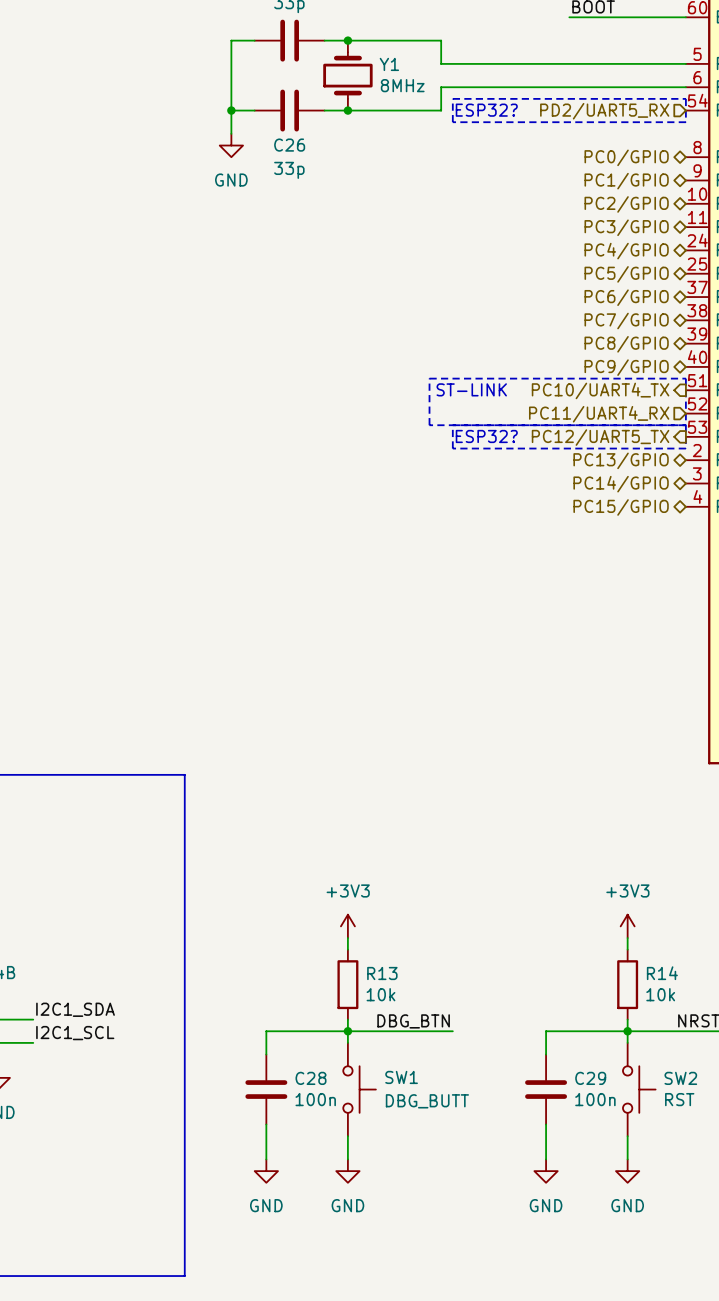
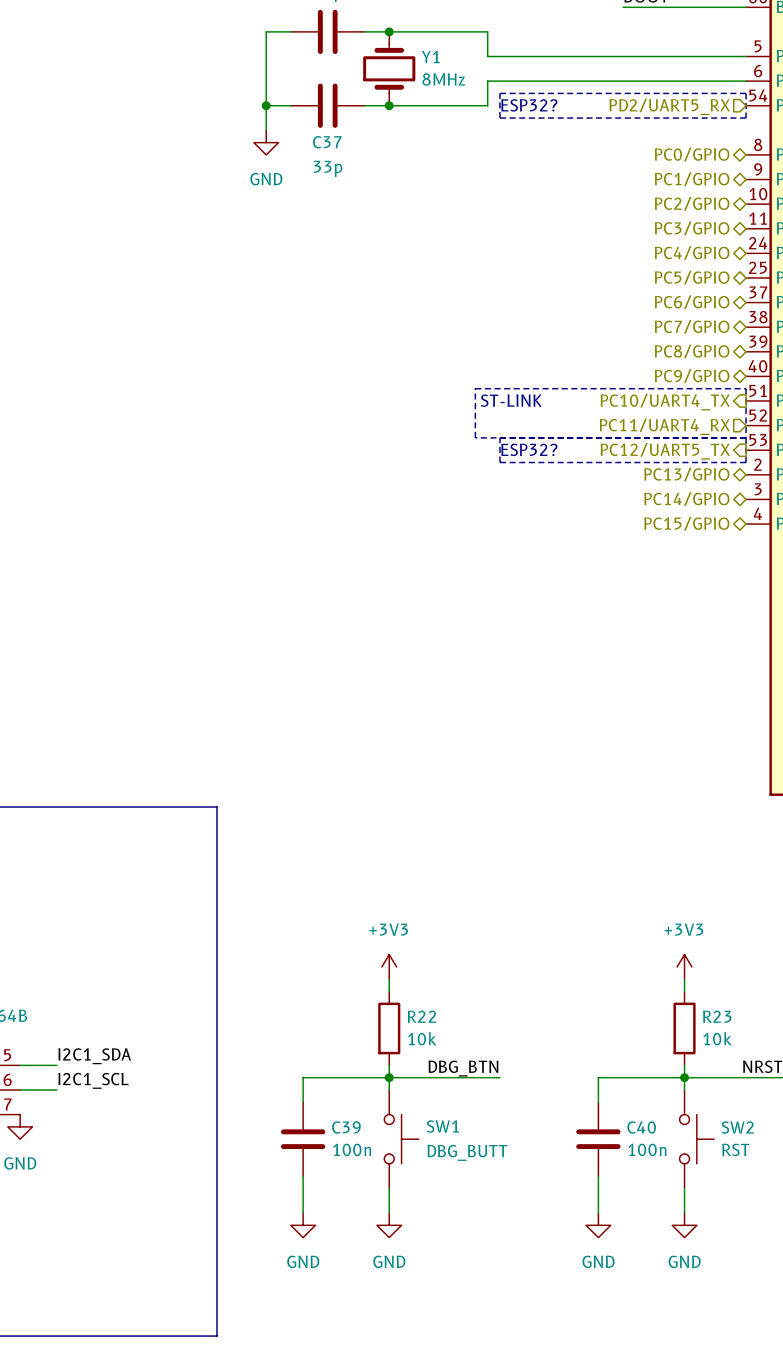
C26 name: C26 (289, 145) -> C37 (327, 142)
R13 name: R13 (382, 973) -> R22 (421, 1016)
R14 name: R14 (662, 973) -> R23 (717, 1016)
C28 name: C28 (311, 1078) -> C39 (346, 1127)
C29 name: C29 (590, 1078) -> C40 (641, 1127)

